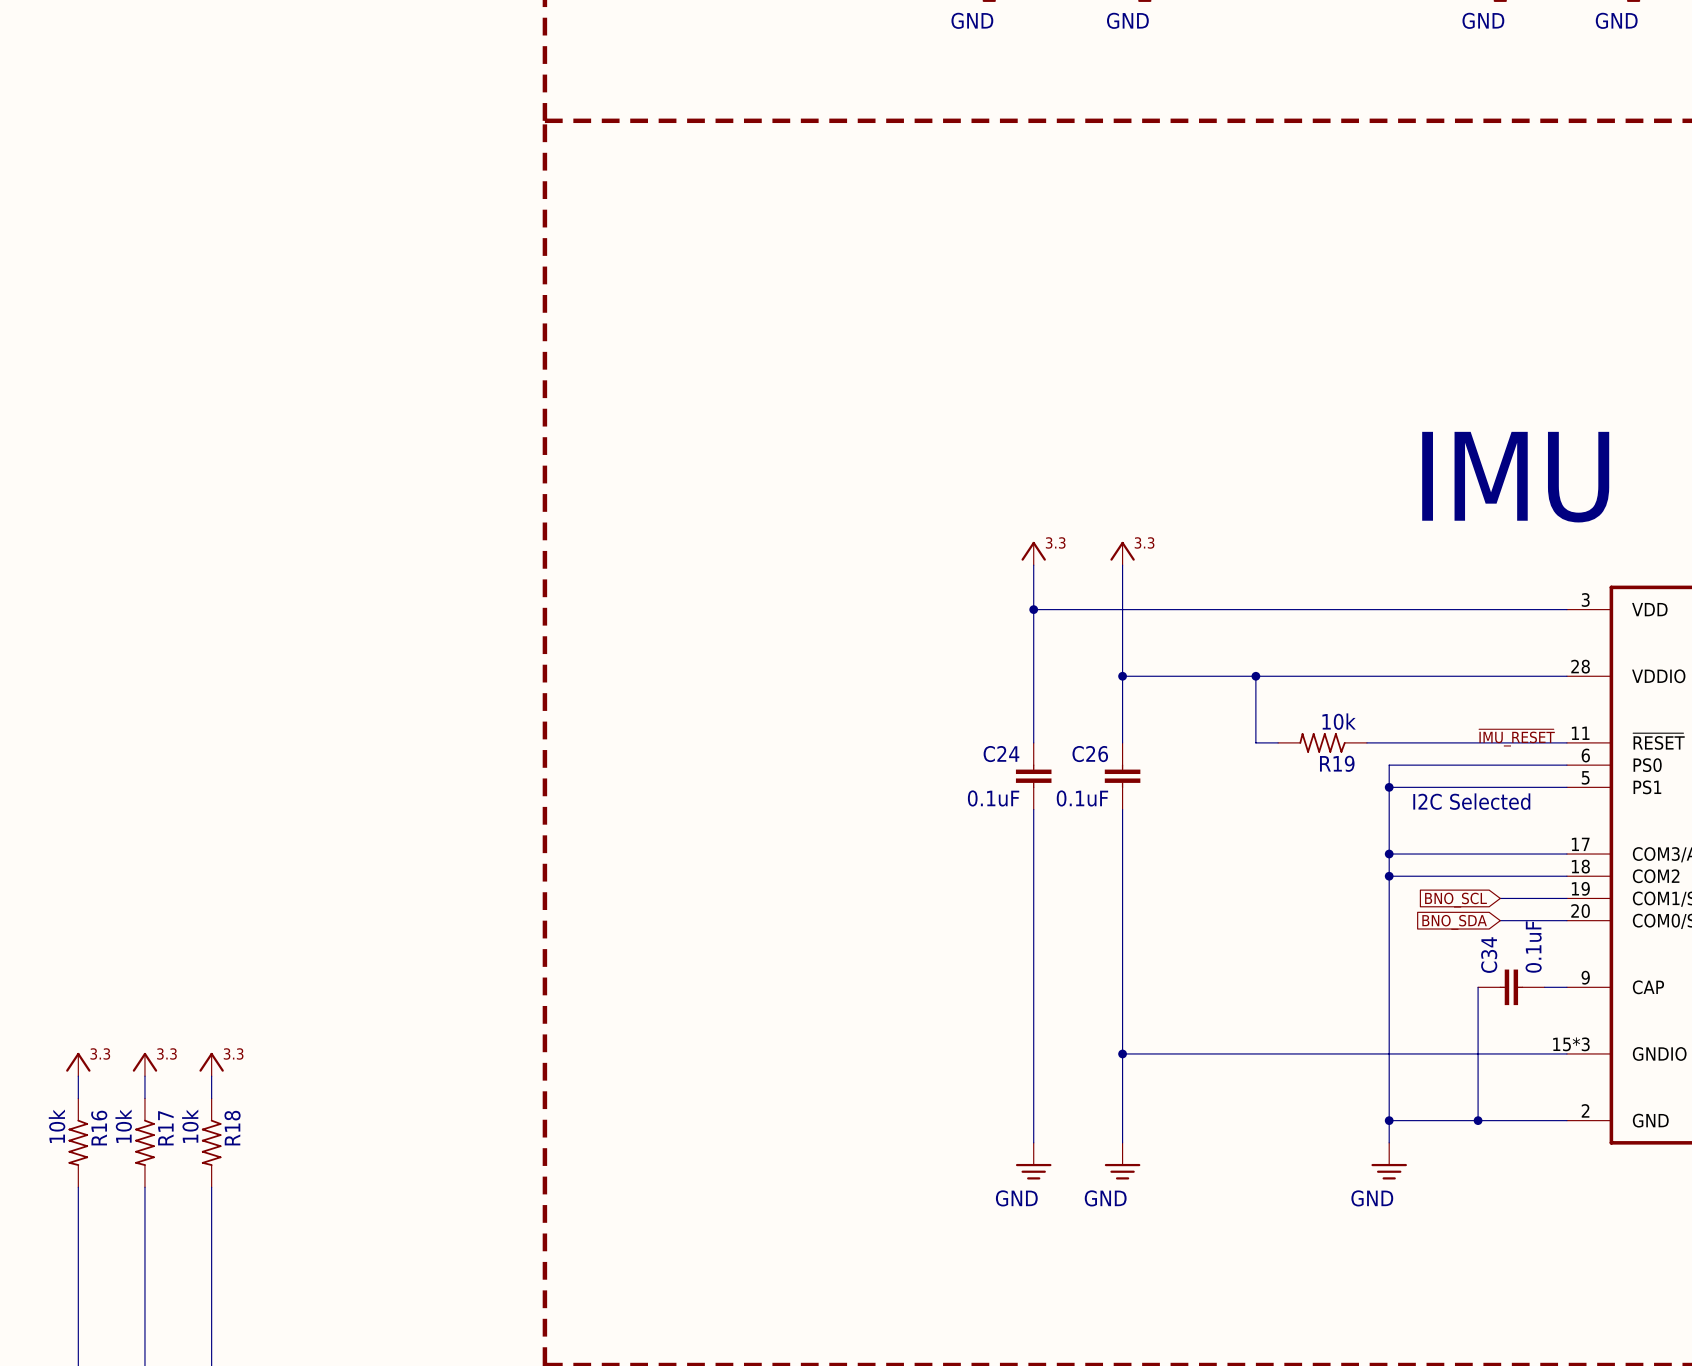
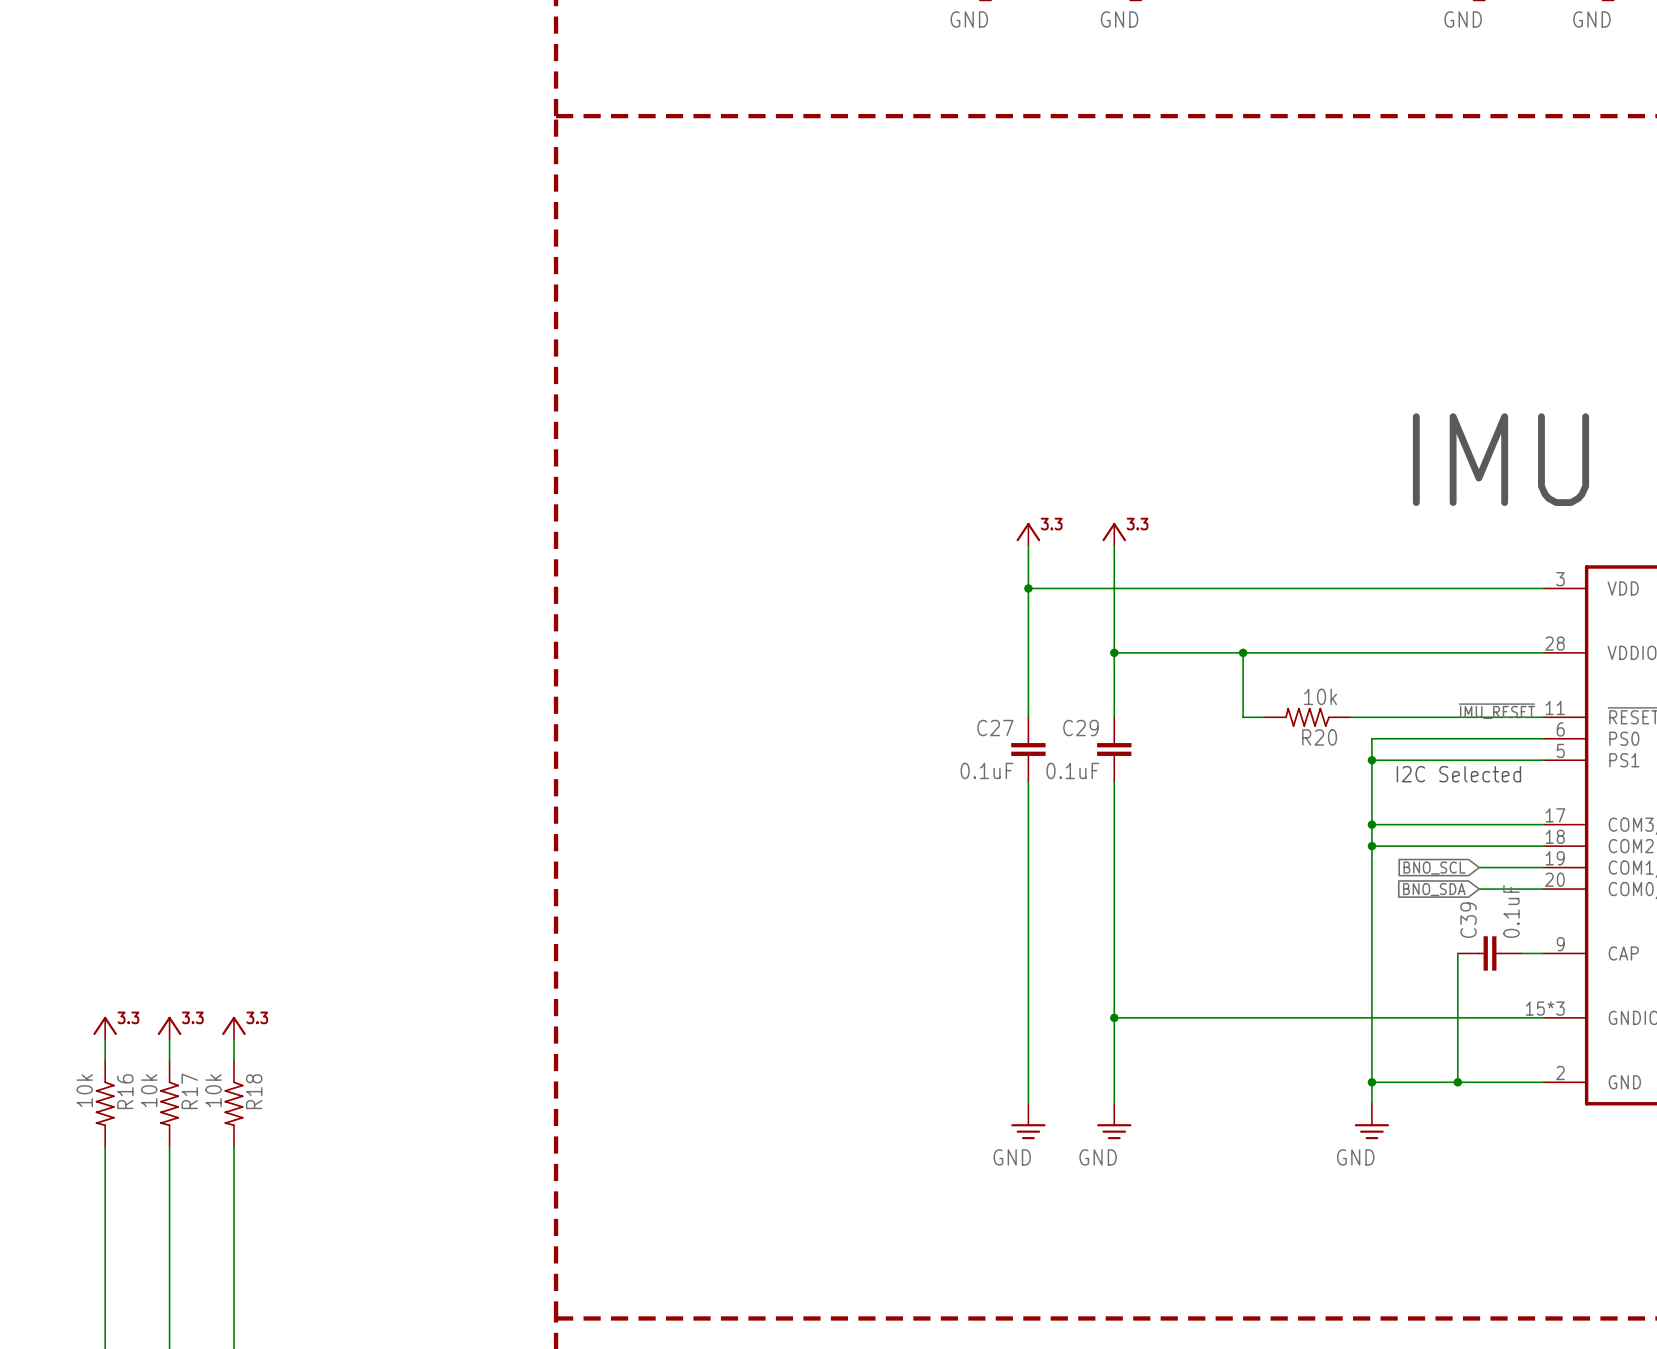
C24 name: C24 (1001, 754) -> C27 (995, 728)
C26 name: C26 (1090, 754) -> C29 (1080, 728)
R19 name: R19 (1337, 763) -> R20 (1319, 737)
C34 name: C34 (1489, 955) -> C39 (1468, 920)

